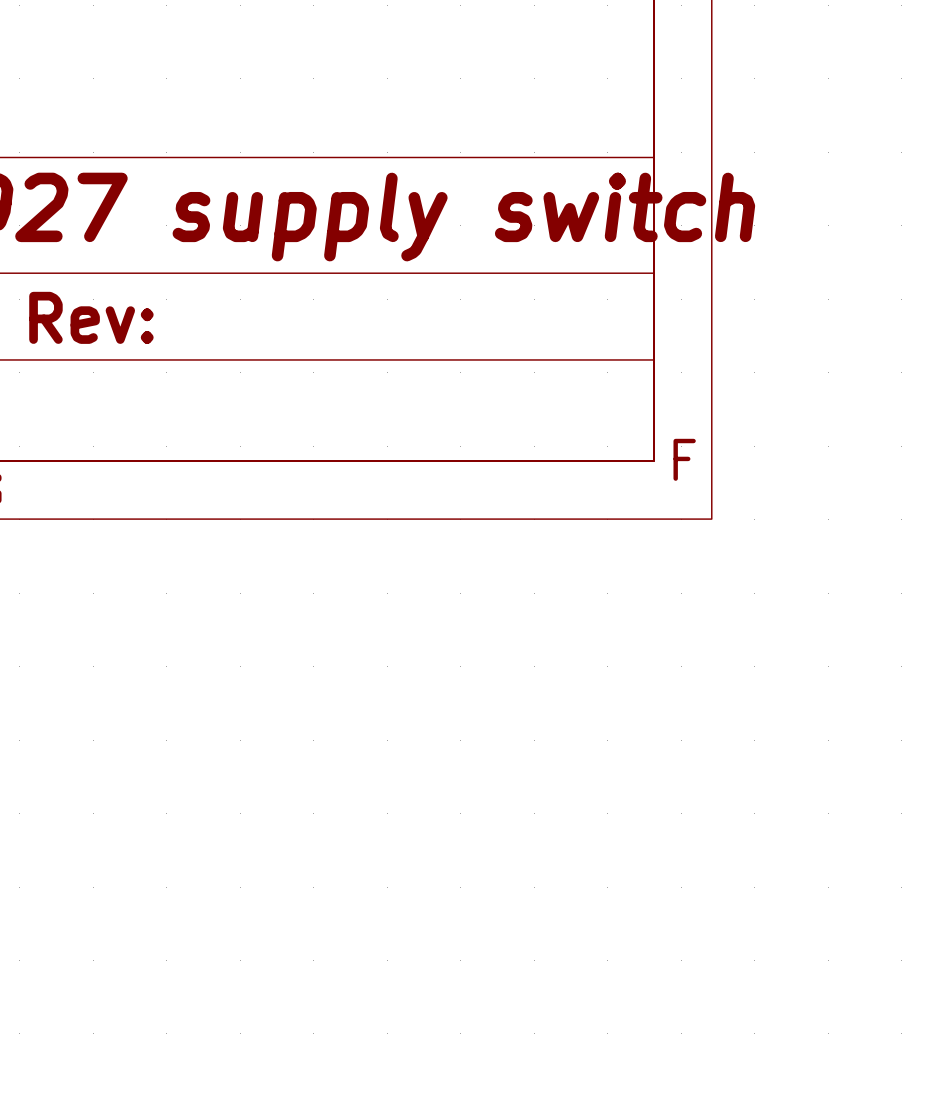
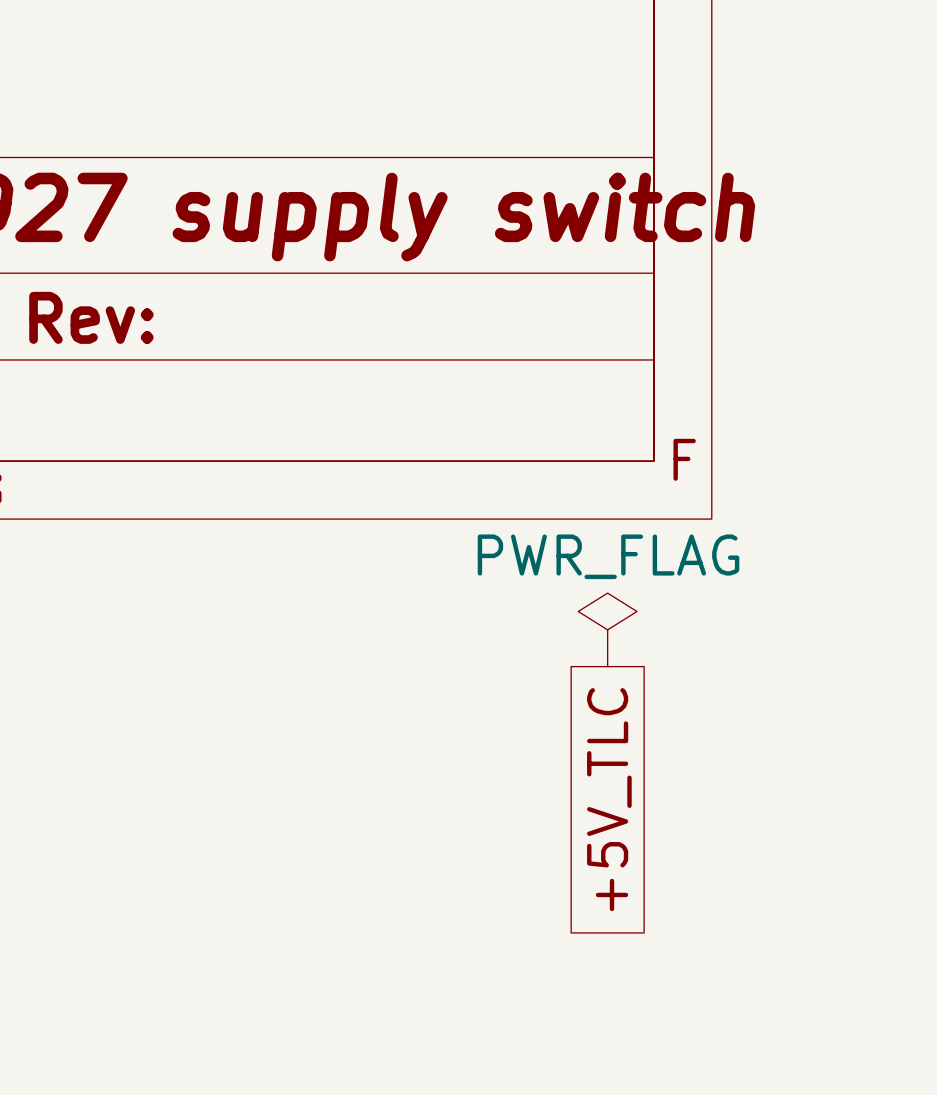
power symbol: none -> PWR_FLAG (607, 629)
global label: none -> +5V_TLC (609, 799)

